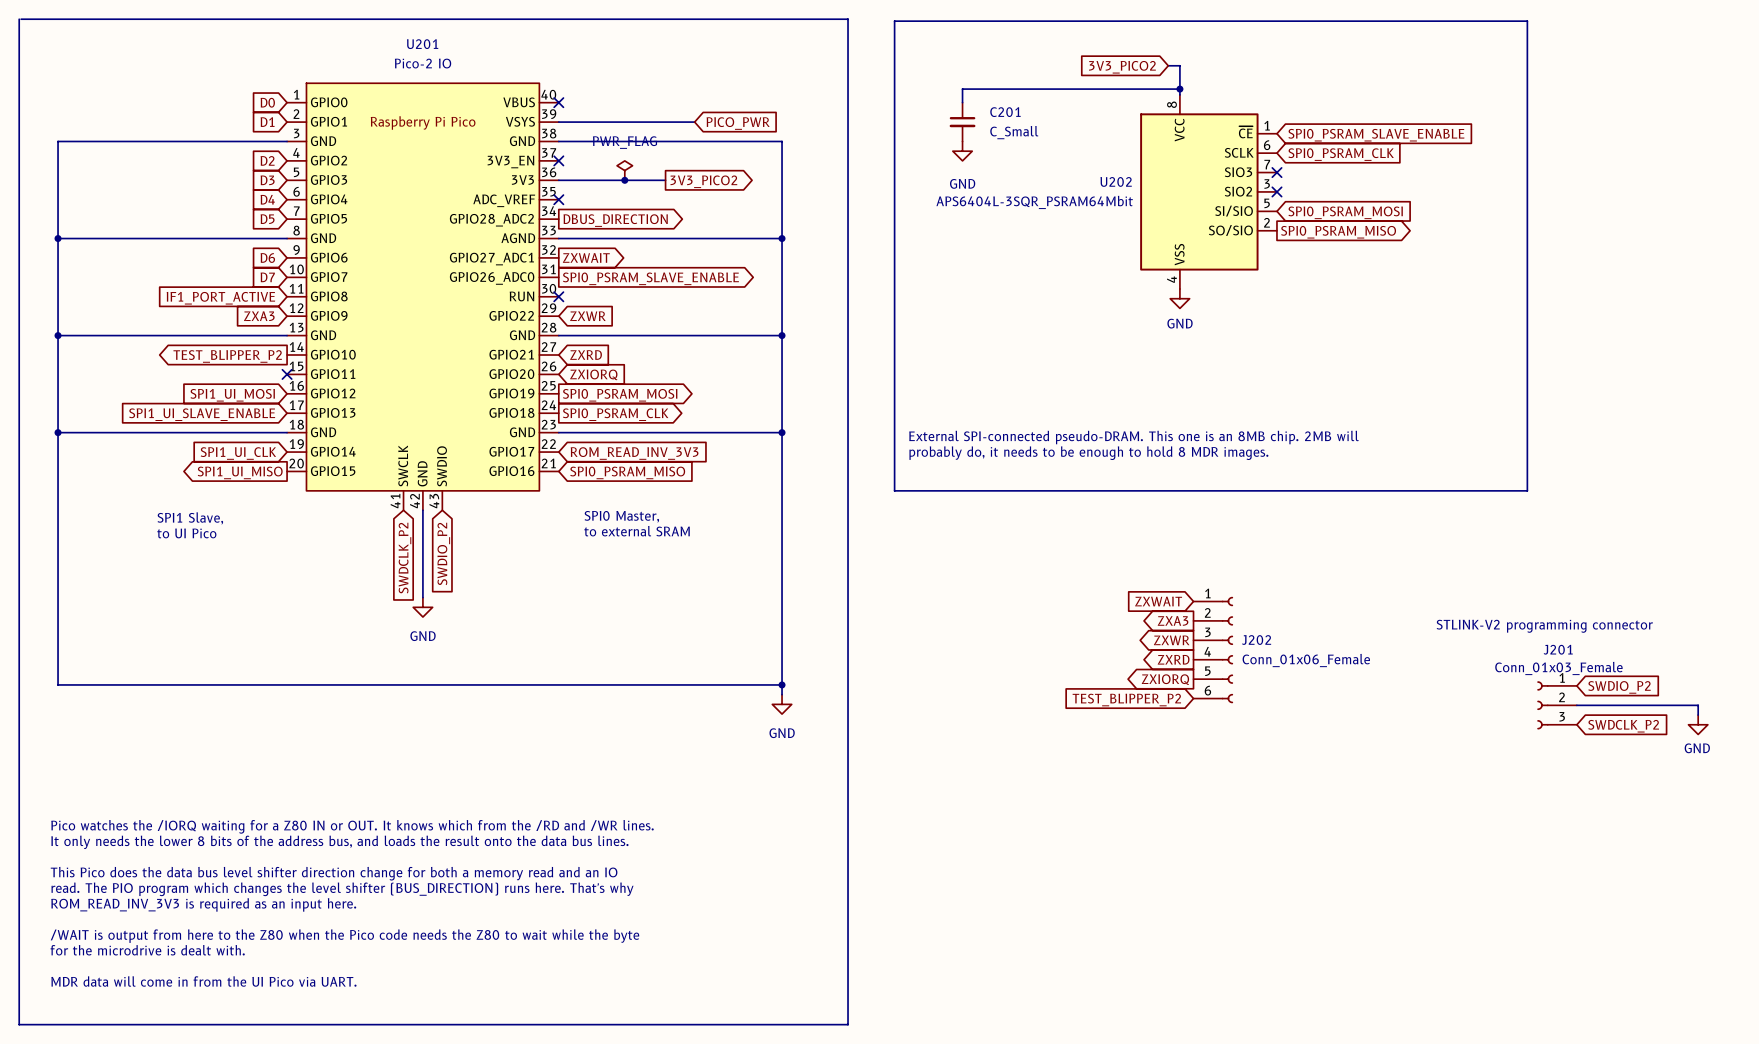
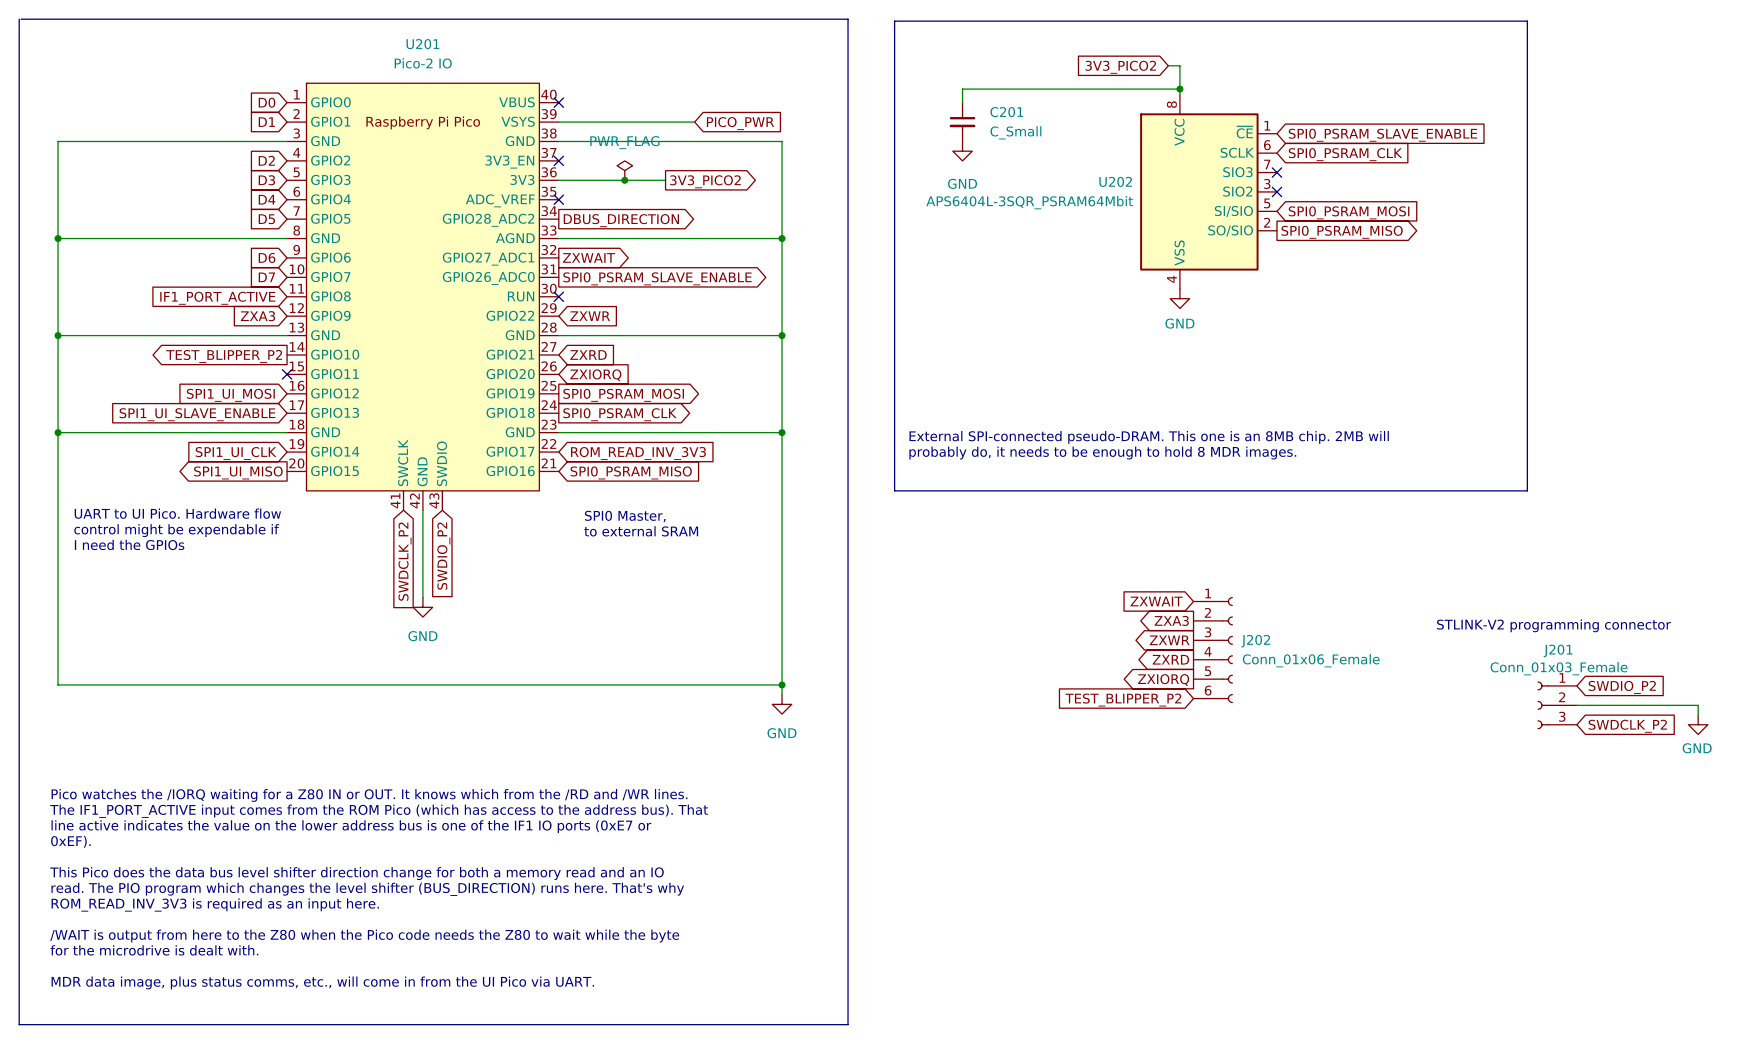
text: none -> UART to UI Pico. Hardware flow (177, 513)
text: SPI1 Slave, (190, 518) -> none
text: none -> control might be expendable if (176, 530)
text: to UI Pico (186, 533) -> none
text: none -> I need the GPIOs (129, 544)
text: none -> Pico watches the /IORQ waiting for a Z80 IN or OUT. It knows which from the /RD and /WR lines. (369, 795)
text: none -> The IF1_PORT_ACTIVE input comes from the ROM Pico (which has access to the address bus). That (379, 811)
text: Pico watches the /IORQ waiting for a Z80 IN or OUT. It knows which from the /RD and /WR lines. (352, 826) -> line active indicates the value on the lower address bus is one of the IF1 IO ports (0xE7 or (351, 826)
text: It only needs the lower 8 bits of the address bus, and loads the result onto the data bus lines. (339, 842) -> 0xEF). (70, 841)
text: MDR data will come in from the UI Pico via UART. (203, 981) -> MDR data image, plus status comms, etc., will come in from the UI Pico via UART. (322, 982)

